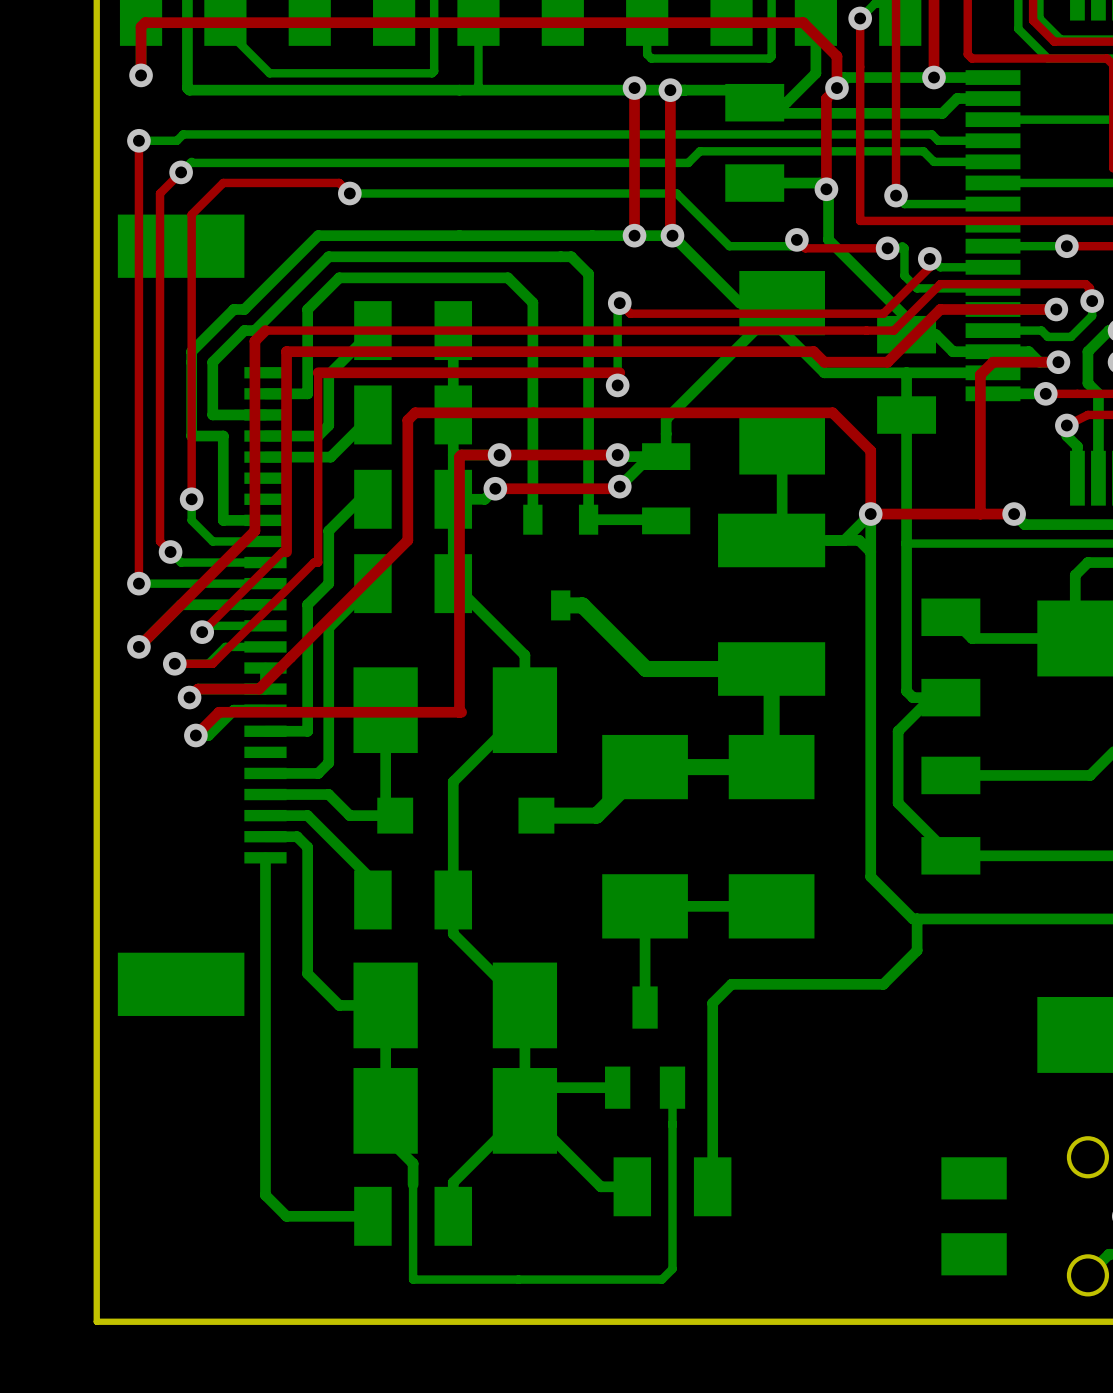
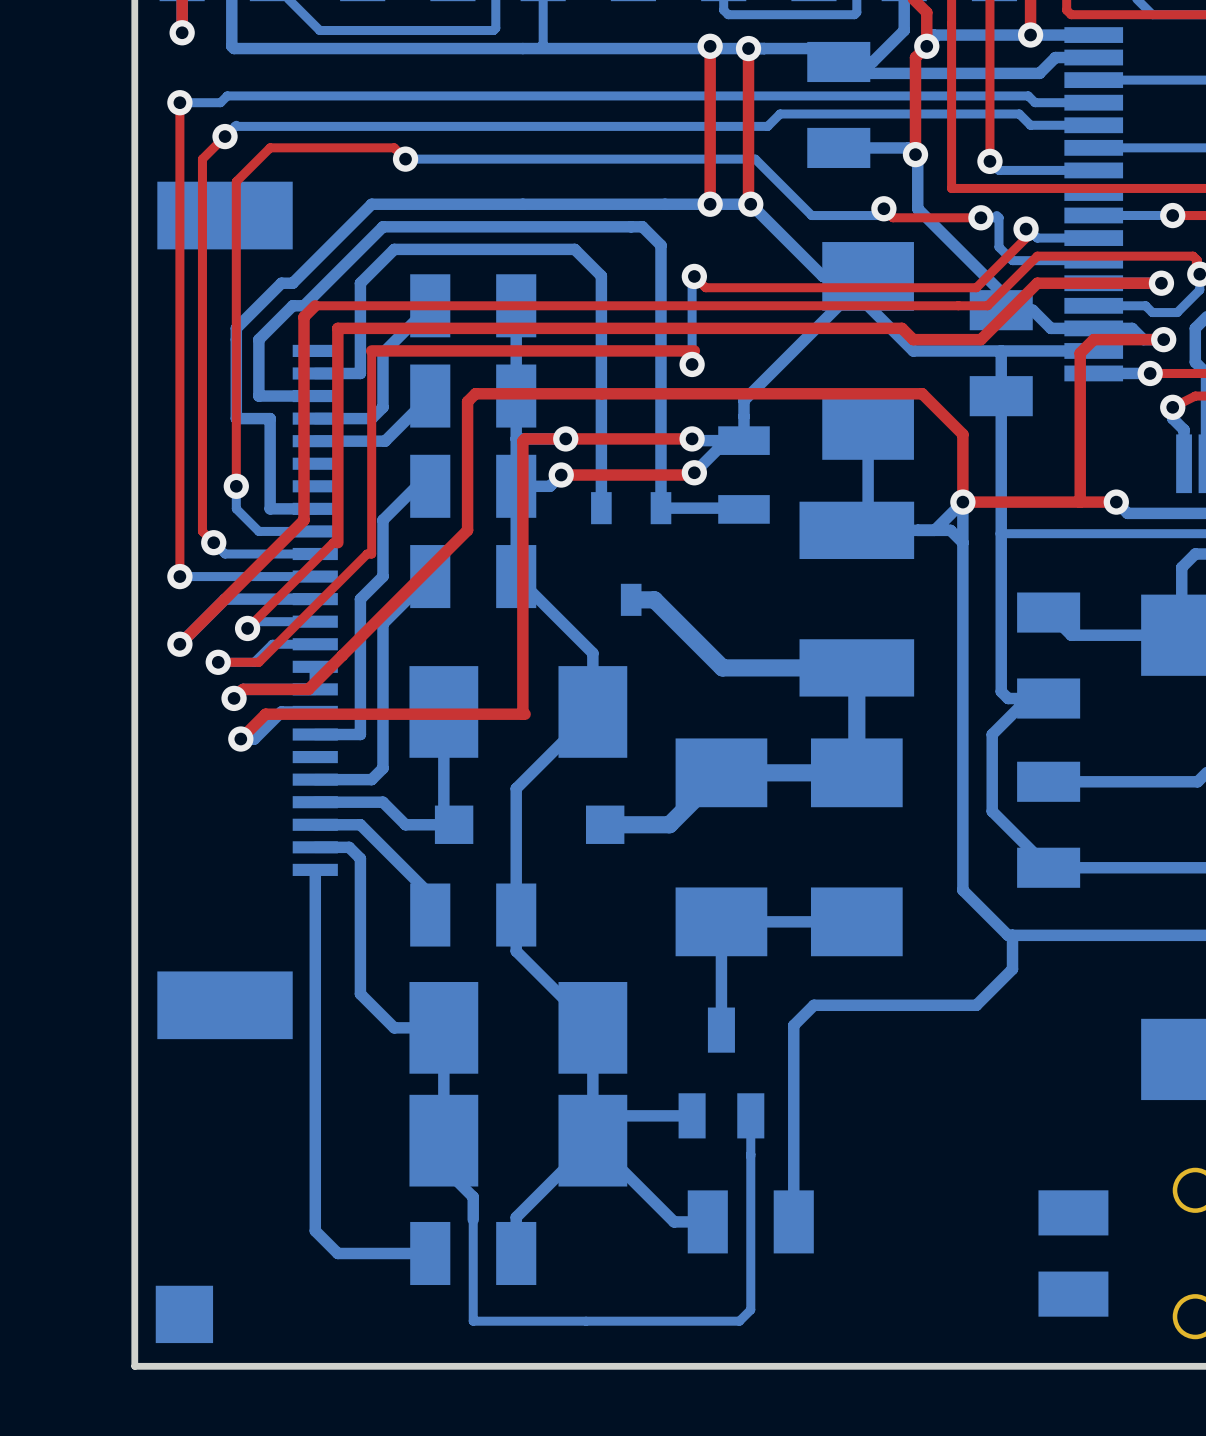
part: none -> (184, 1314)

